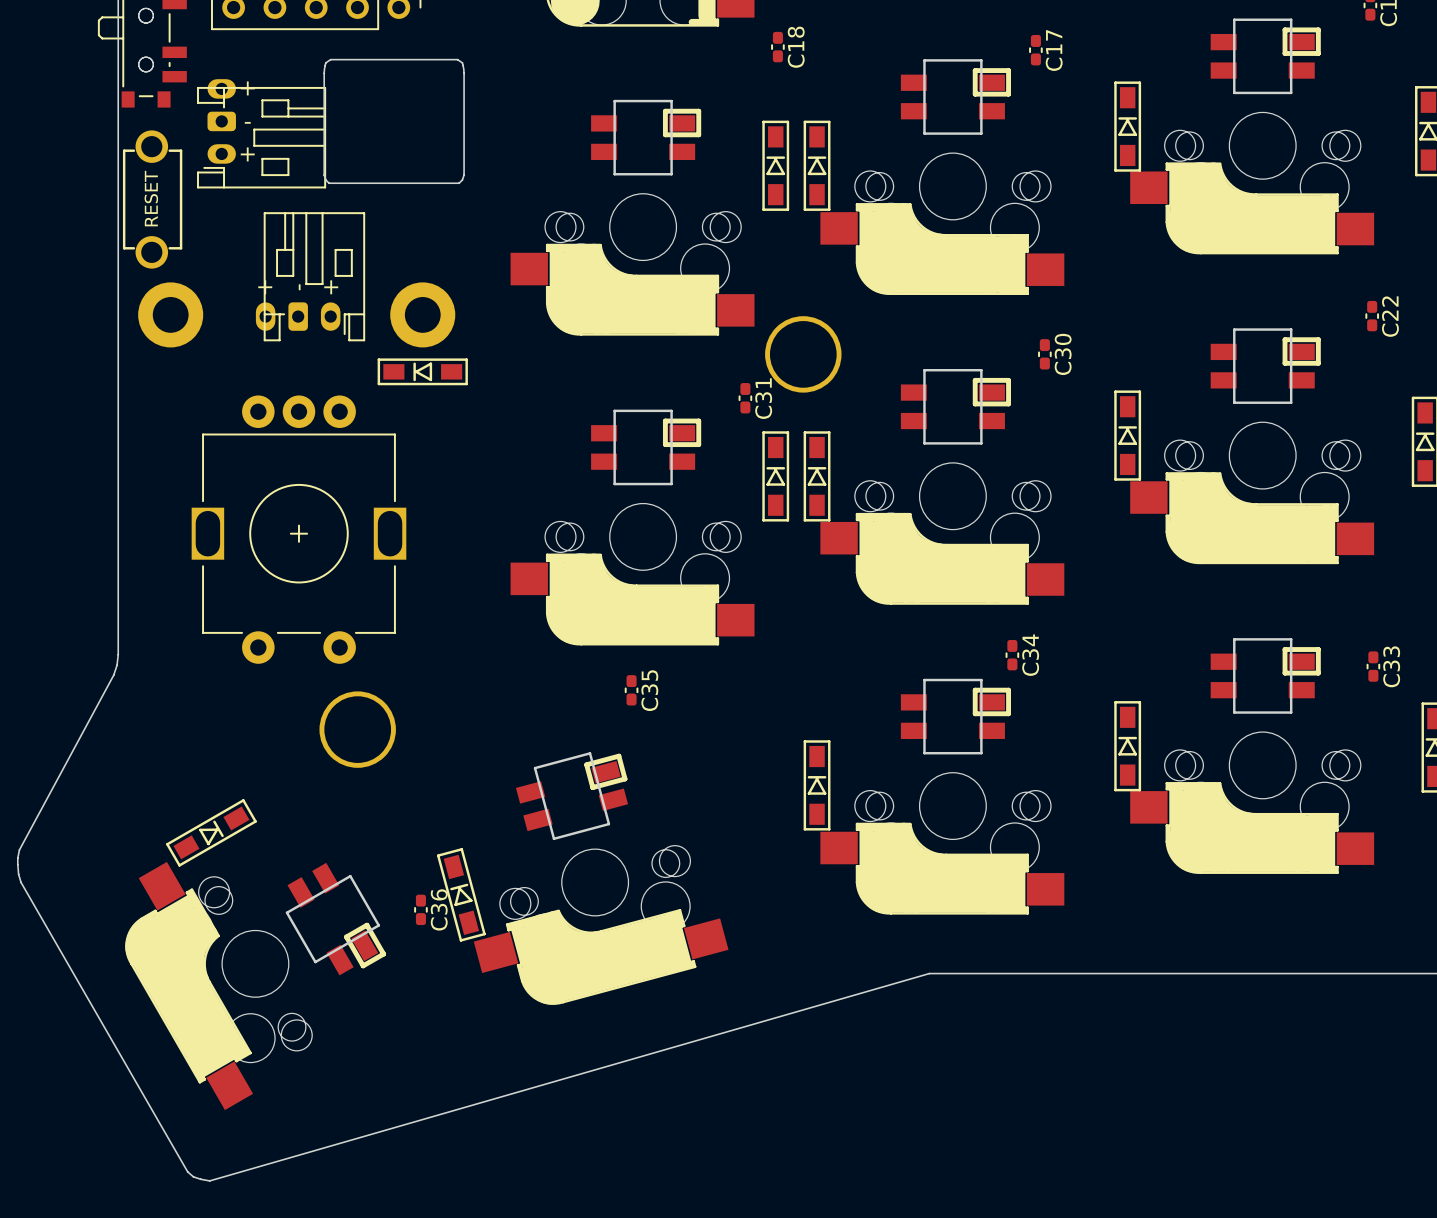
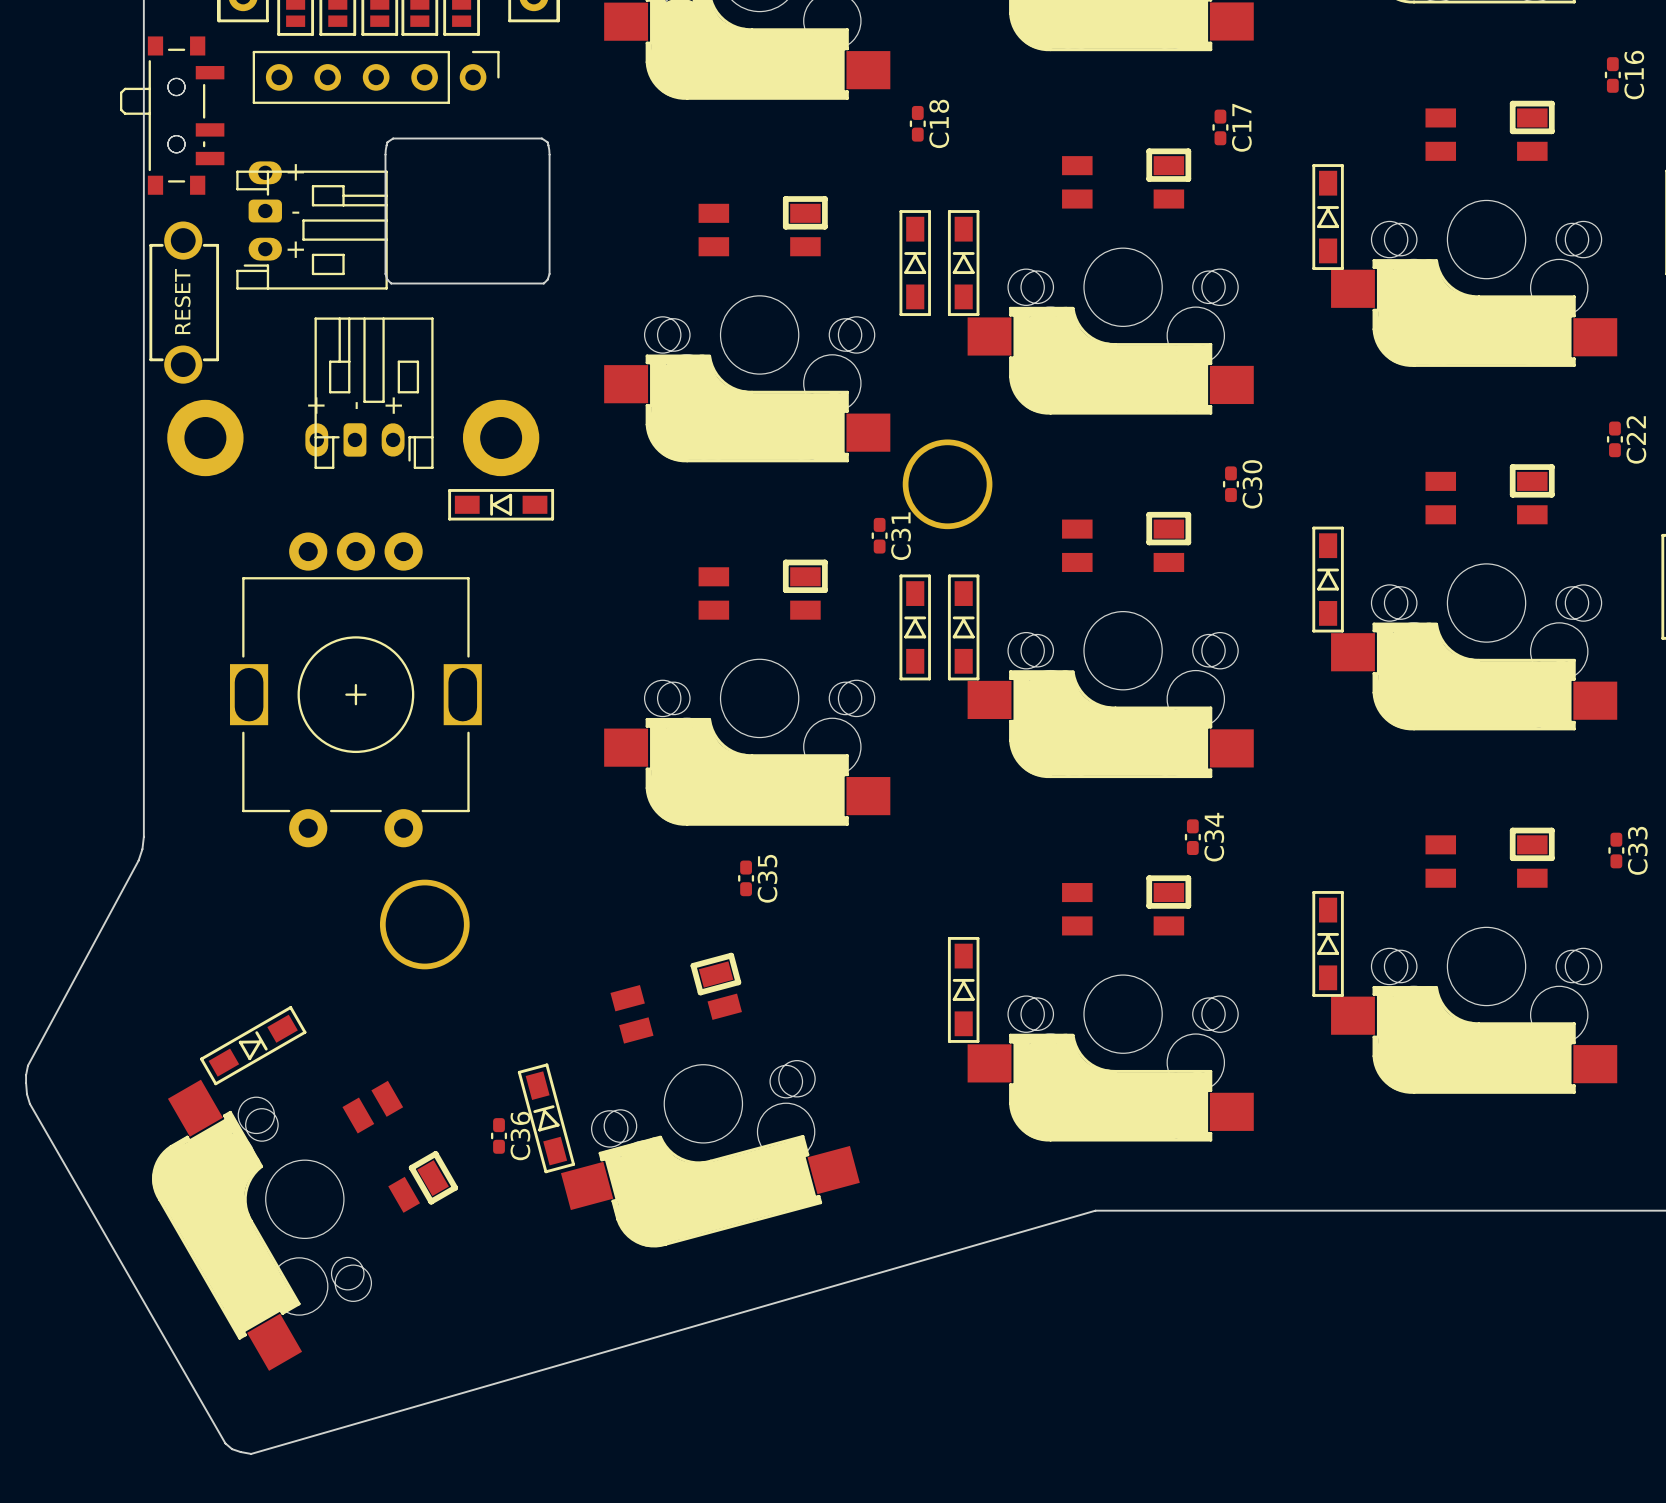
board edge: (1234, 19) (1234, 92) (1291, 92) (1291, 19) (1234, 19) -> none
board edge: (924, 60) (981, 60) (981, 133) (924, 133) (924, 60) -> none
board edge: (614, 101) (614, 174) (671, 174) (671, 101) (614, 101) -> none
board edge: (1234, 329) (1234, 402) (1291, 402) (1291, 329) (1234, 329) -> none
board edge: (924, 370) (924, 443) (981, 443) (981, 370) (924, 370) -> none
board edge: (614, 410) (614, 484) (671, 484) (671, 410) (614, 410) -> none
board edge: (1234, 639) (1234, 712) (1291, 712) (1291, 639) (1234, 639) -> none
board edge: (924, 680) (924, 753) (981, 753) (981, 680) (924, 680) -> none
board edge: (590, 753) (608, 824) (553, 838) (535, 768) (590, 753) -> none
board edge: (350, 876) (286, 912) (315, 962) (378, 925) (350, 876) -> none

